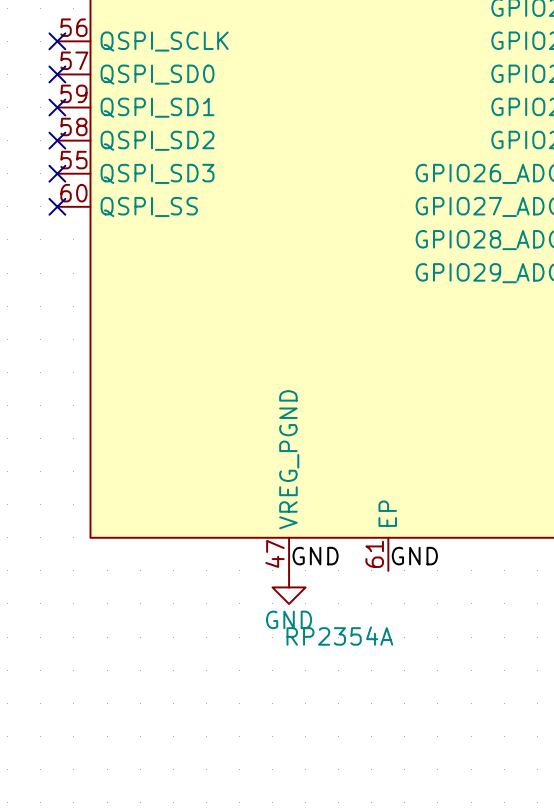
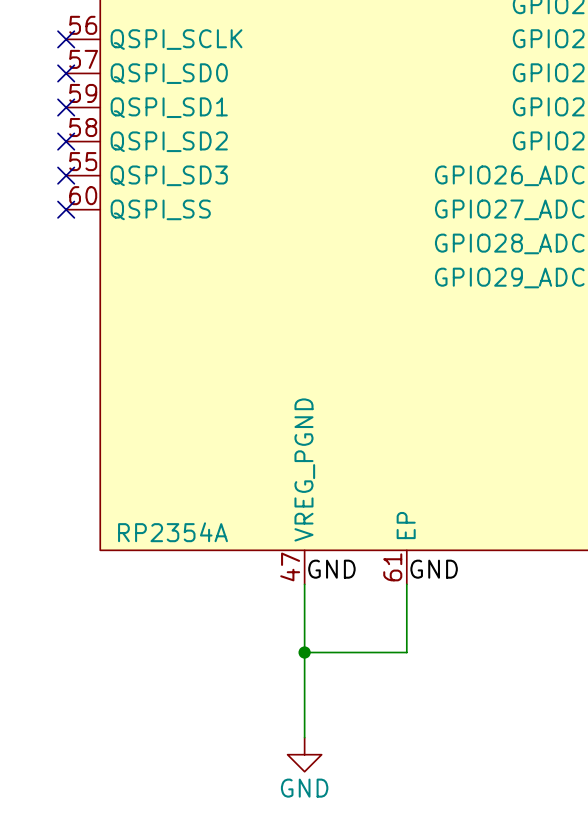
wire: none -> (304, 584) (304, 737)
wire: none -> (406, 584) (406, 652) (304, 652)
power symbol position: GND (289, 587) -> GND (304, 754)
part value position: RP2354A (339, 636) -> RP2354A (172, 532)
junction: none -> (304, 652)

